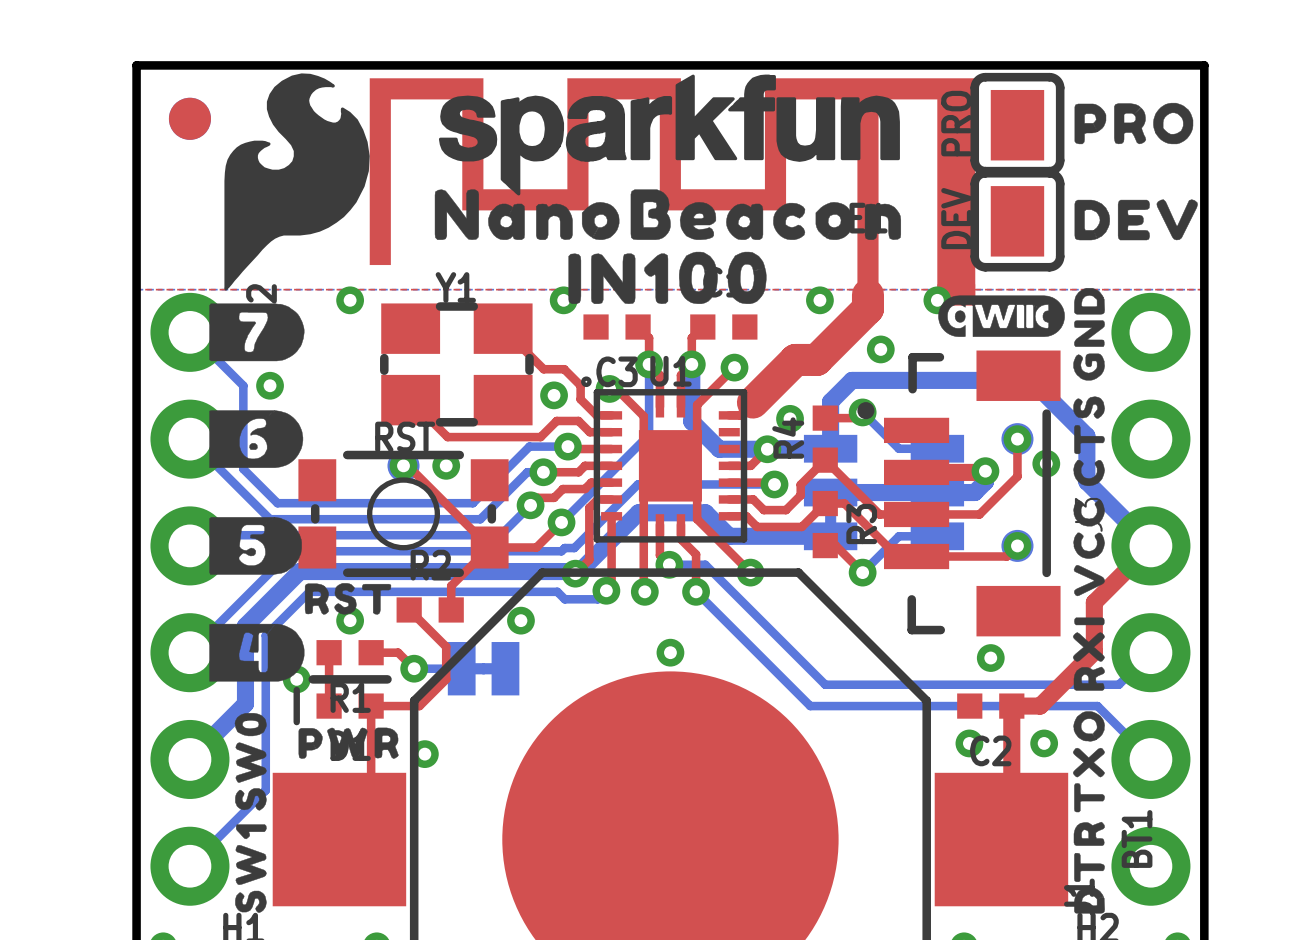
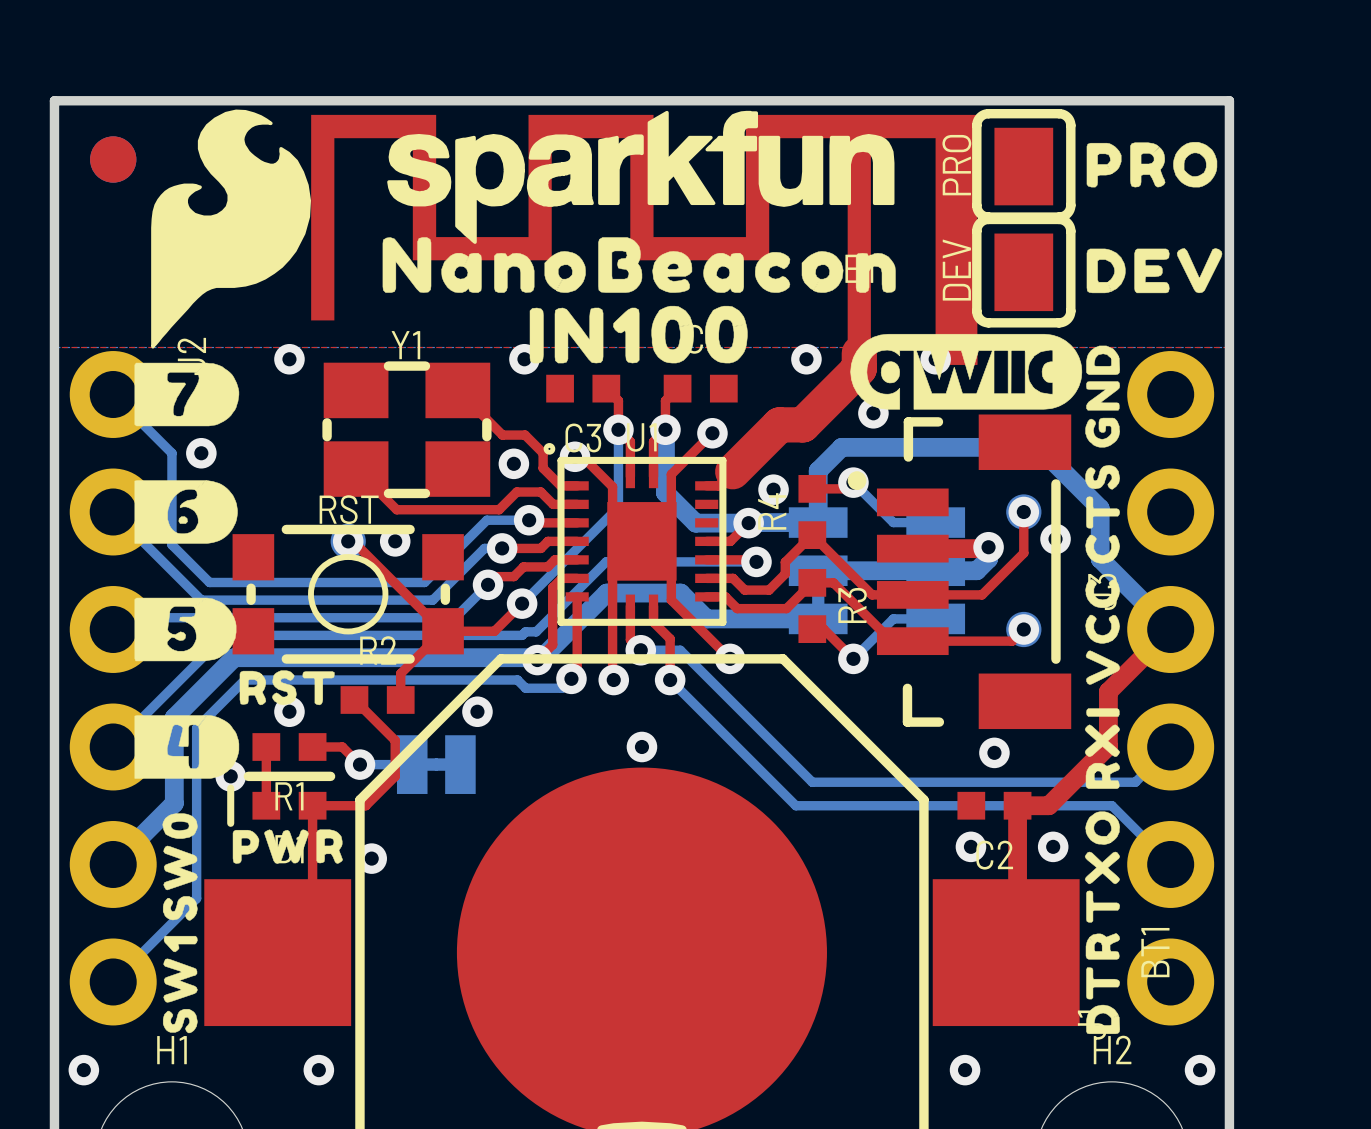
drawing shape: [938, 295, 1065, 337] -> [850, 333, 1083, 410]

